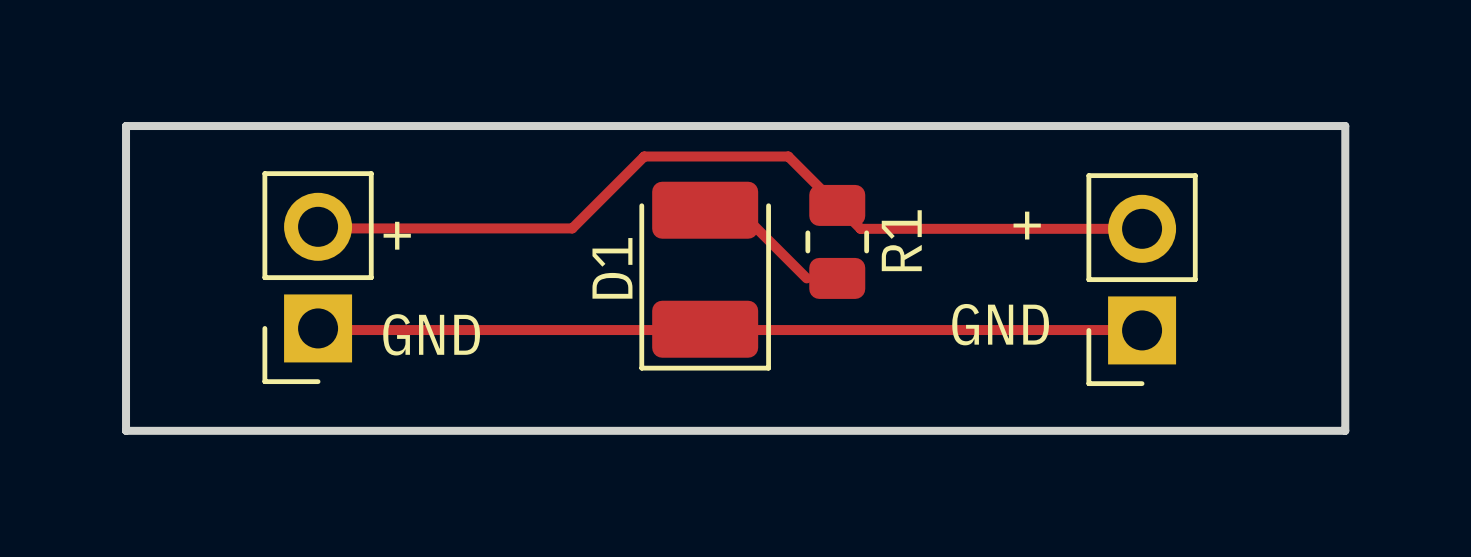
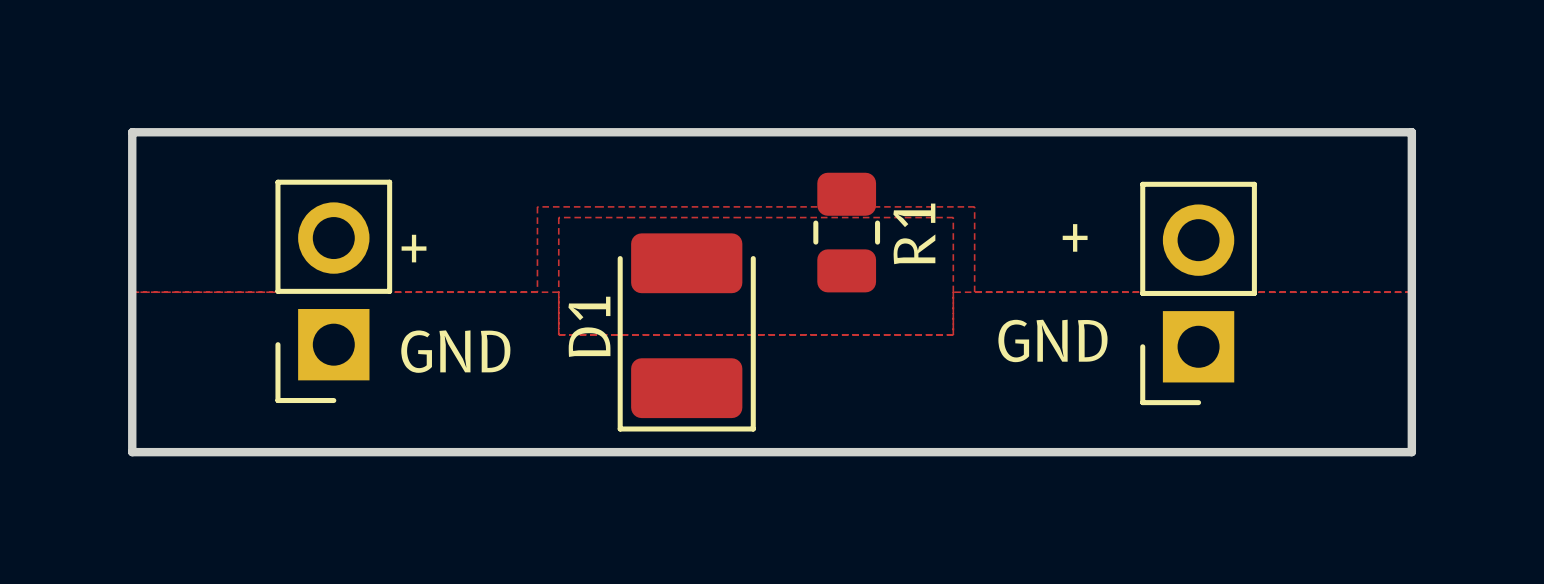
top zone outline: none -> (558, 217) (953, 217) (953, 334) (558, 334) (558, 217)
top track: (705, 210) (738, 210) (806, 278) -> none
top track: (318, 228) (572, 228) (644, 156) (788, 156) (860, 228) (1142, 228) -> none
R1 position: (837, 241) -> (846, 232)
D1 position: (705, 276) -> (686, 332)
top zone outline: none -> (132, 292) (558, 292)
top zone outline: none -> (537, 292) (537, 206) (974, 206) (974, 292)
top zone outline: none -> (953, 292) (1411, 292)
top track: (318, 330) (1141, 330) -> none

